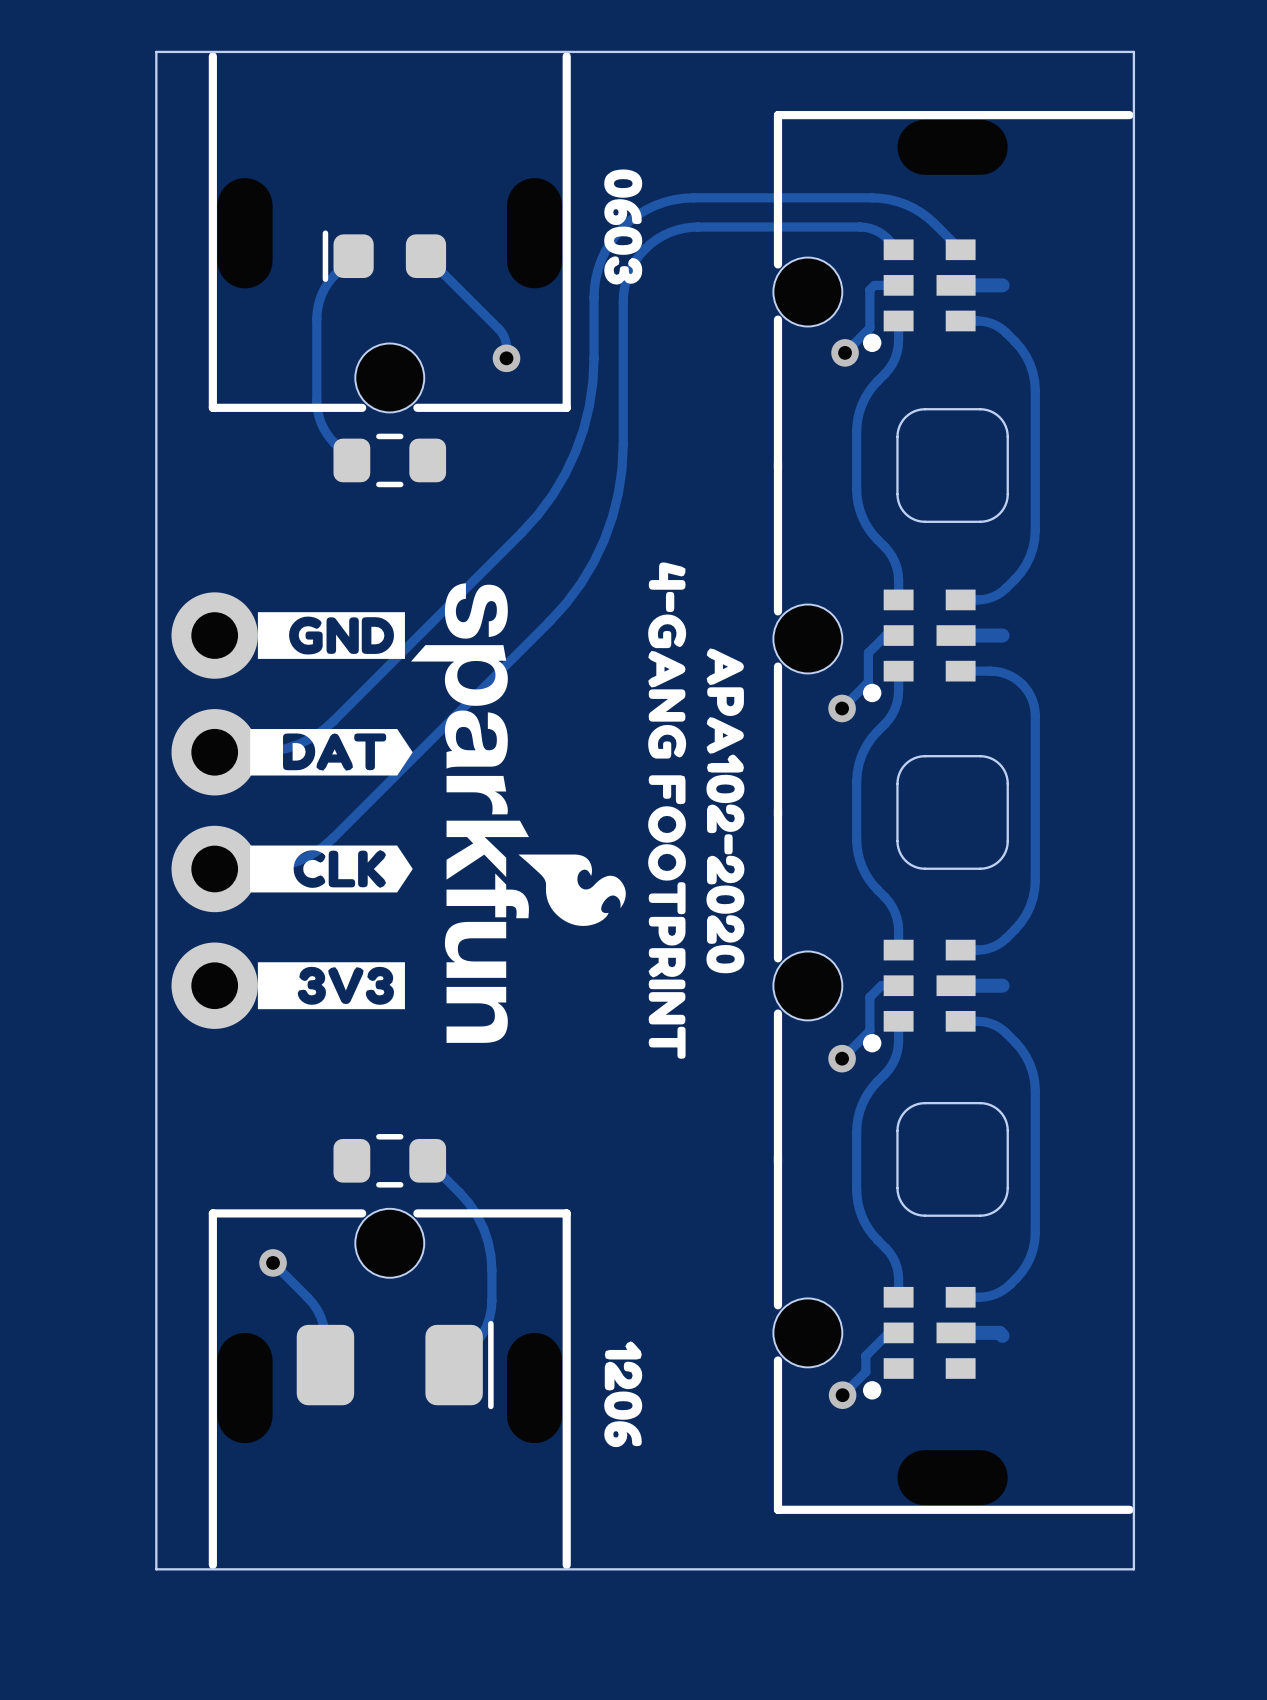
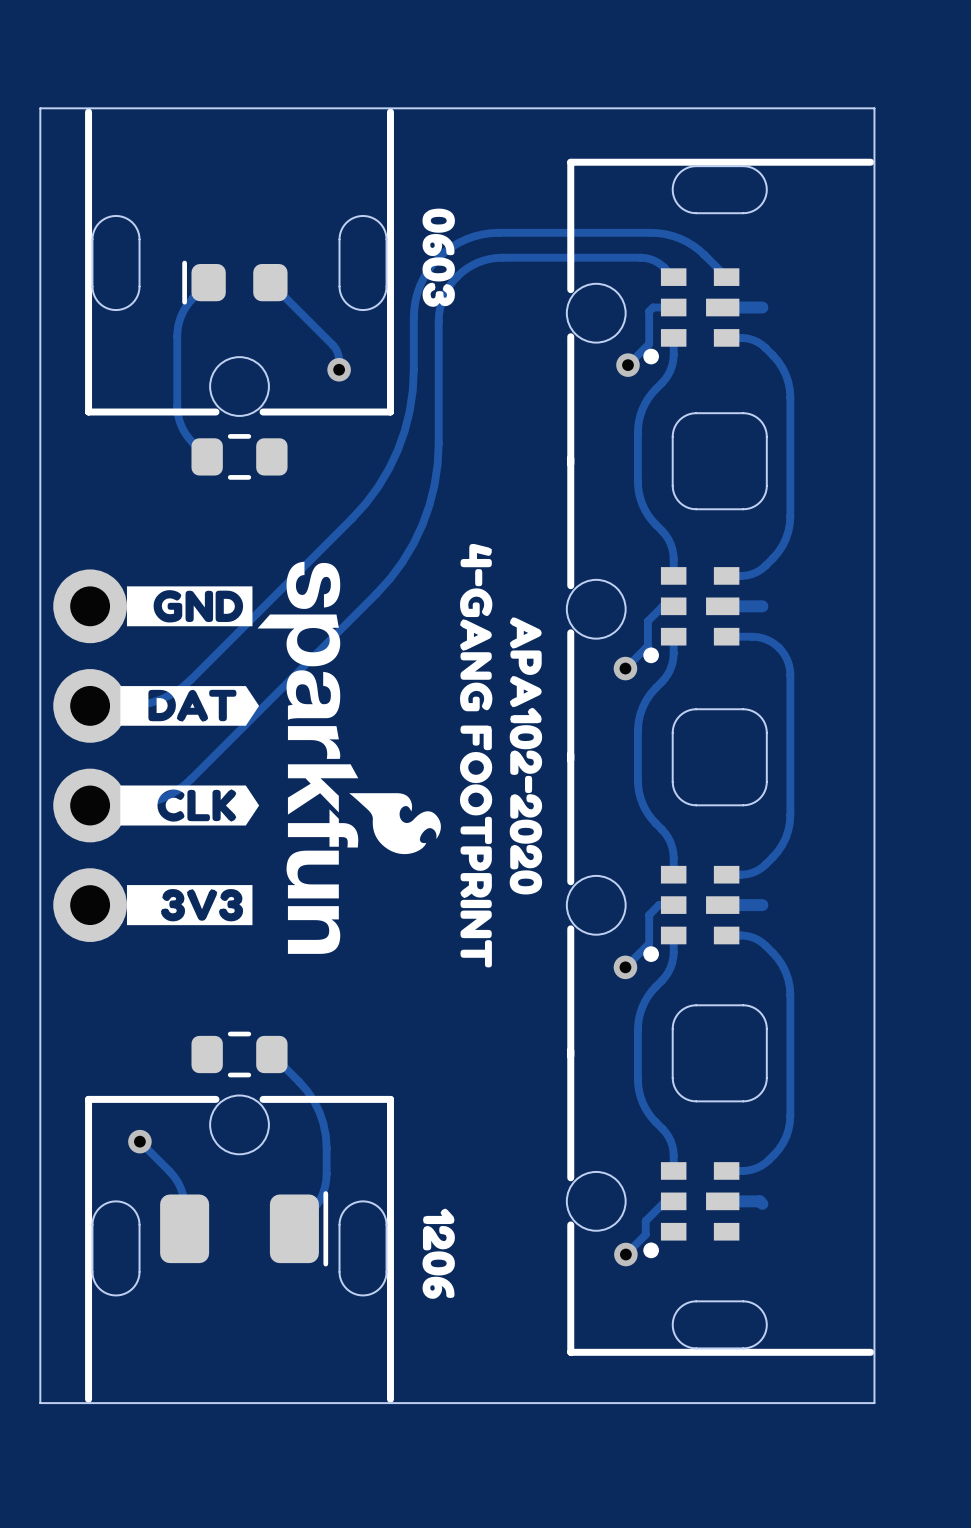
drawing: none -> [85, 108, 394, 417]
drawing: none -> [565, 158, 875, 1356]
part: (389, 232) -> none
part: (953, 812) -> none
drawing: none -> [85, 1094, 394, 1403]
part: (389, 1388) -> none

